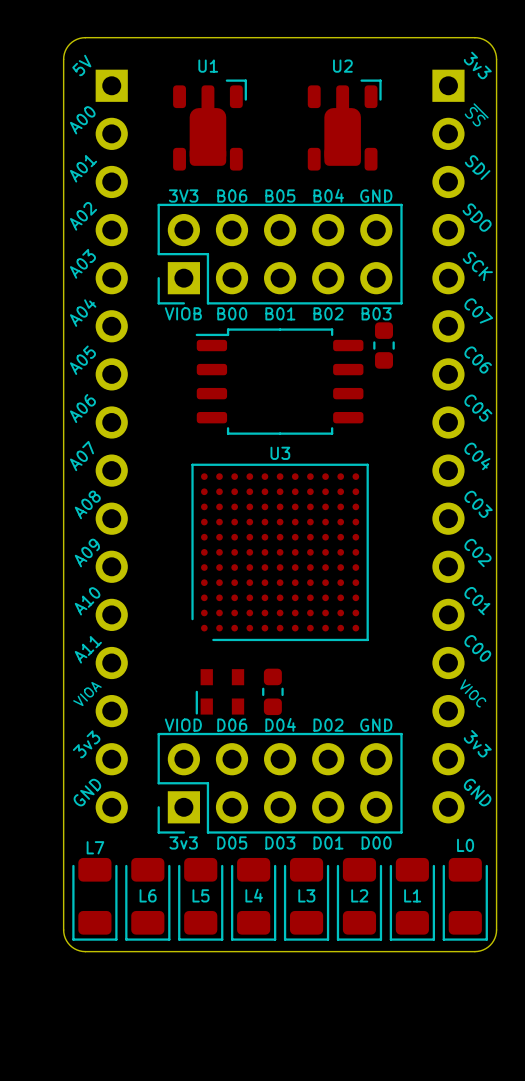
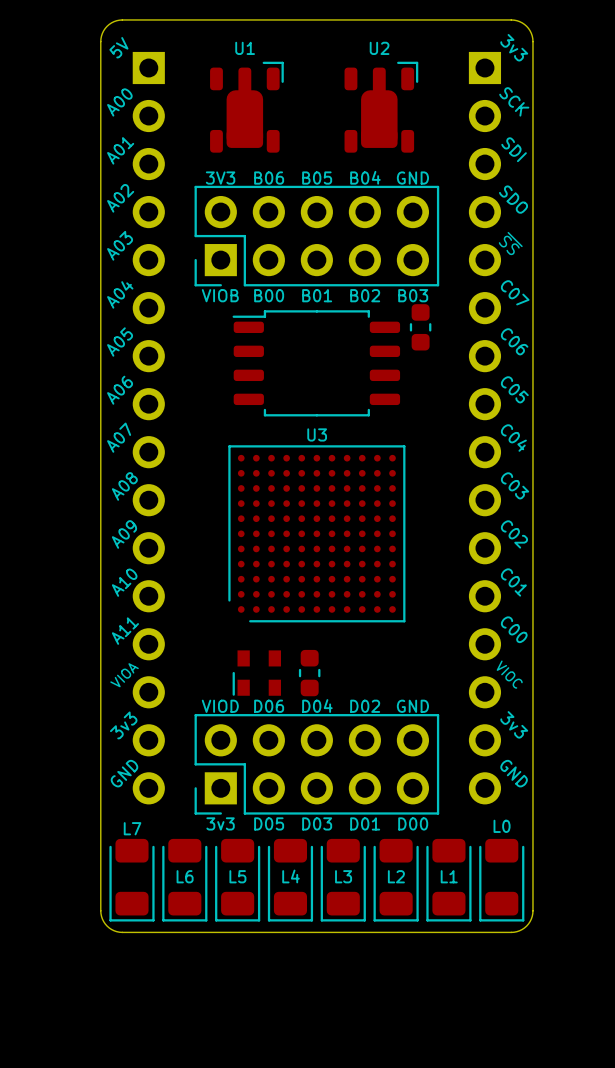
text: ~{SS} (476, 114) -> SCK (514, 101)
text: SCK (477, 266) -> ~{SS} (510, 243)

